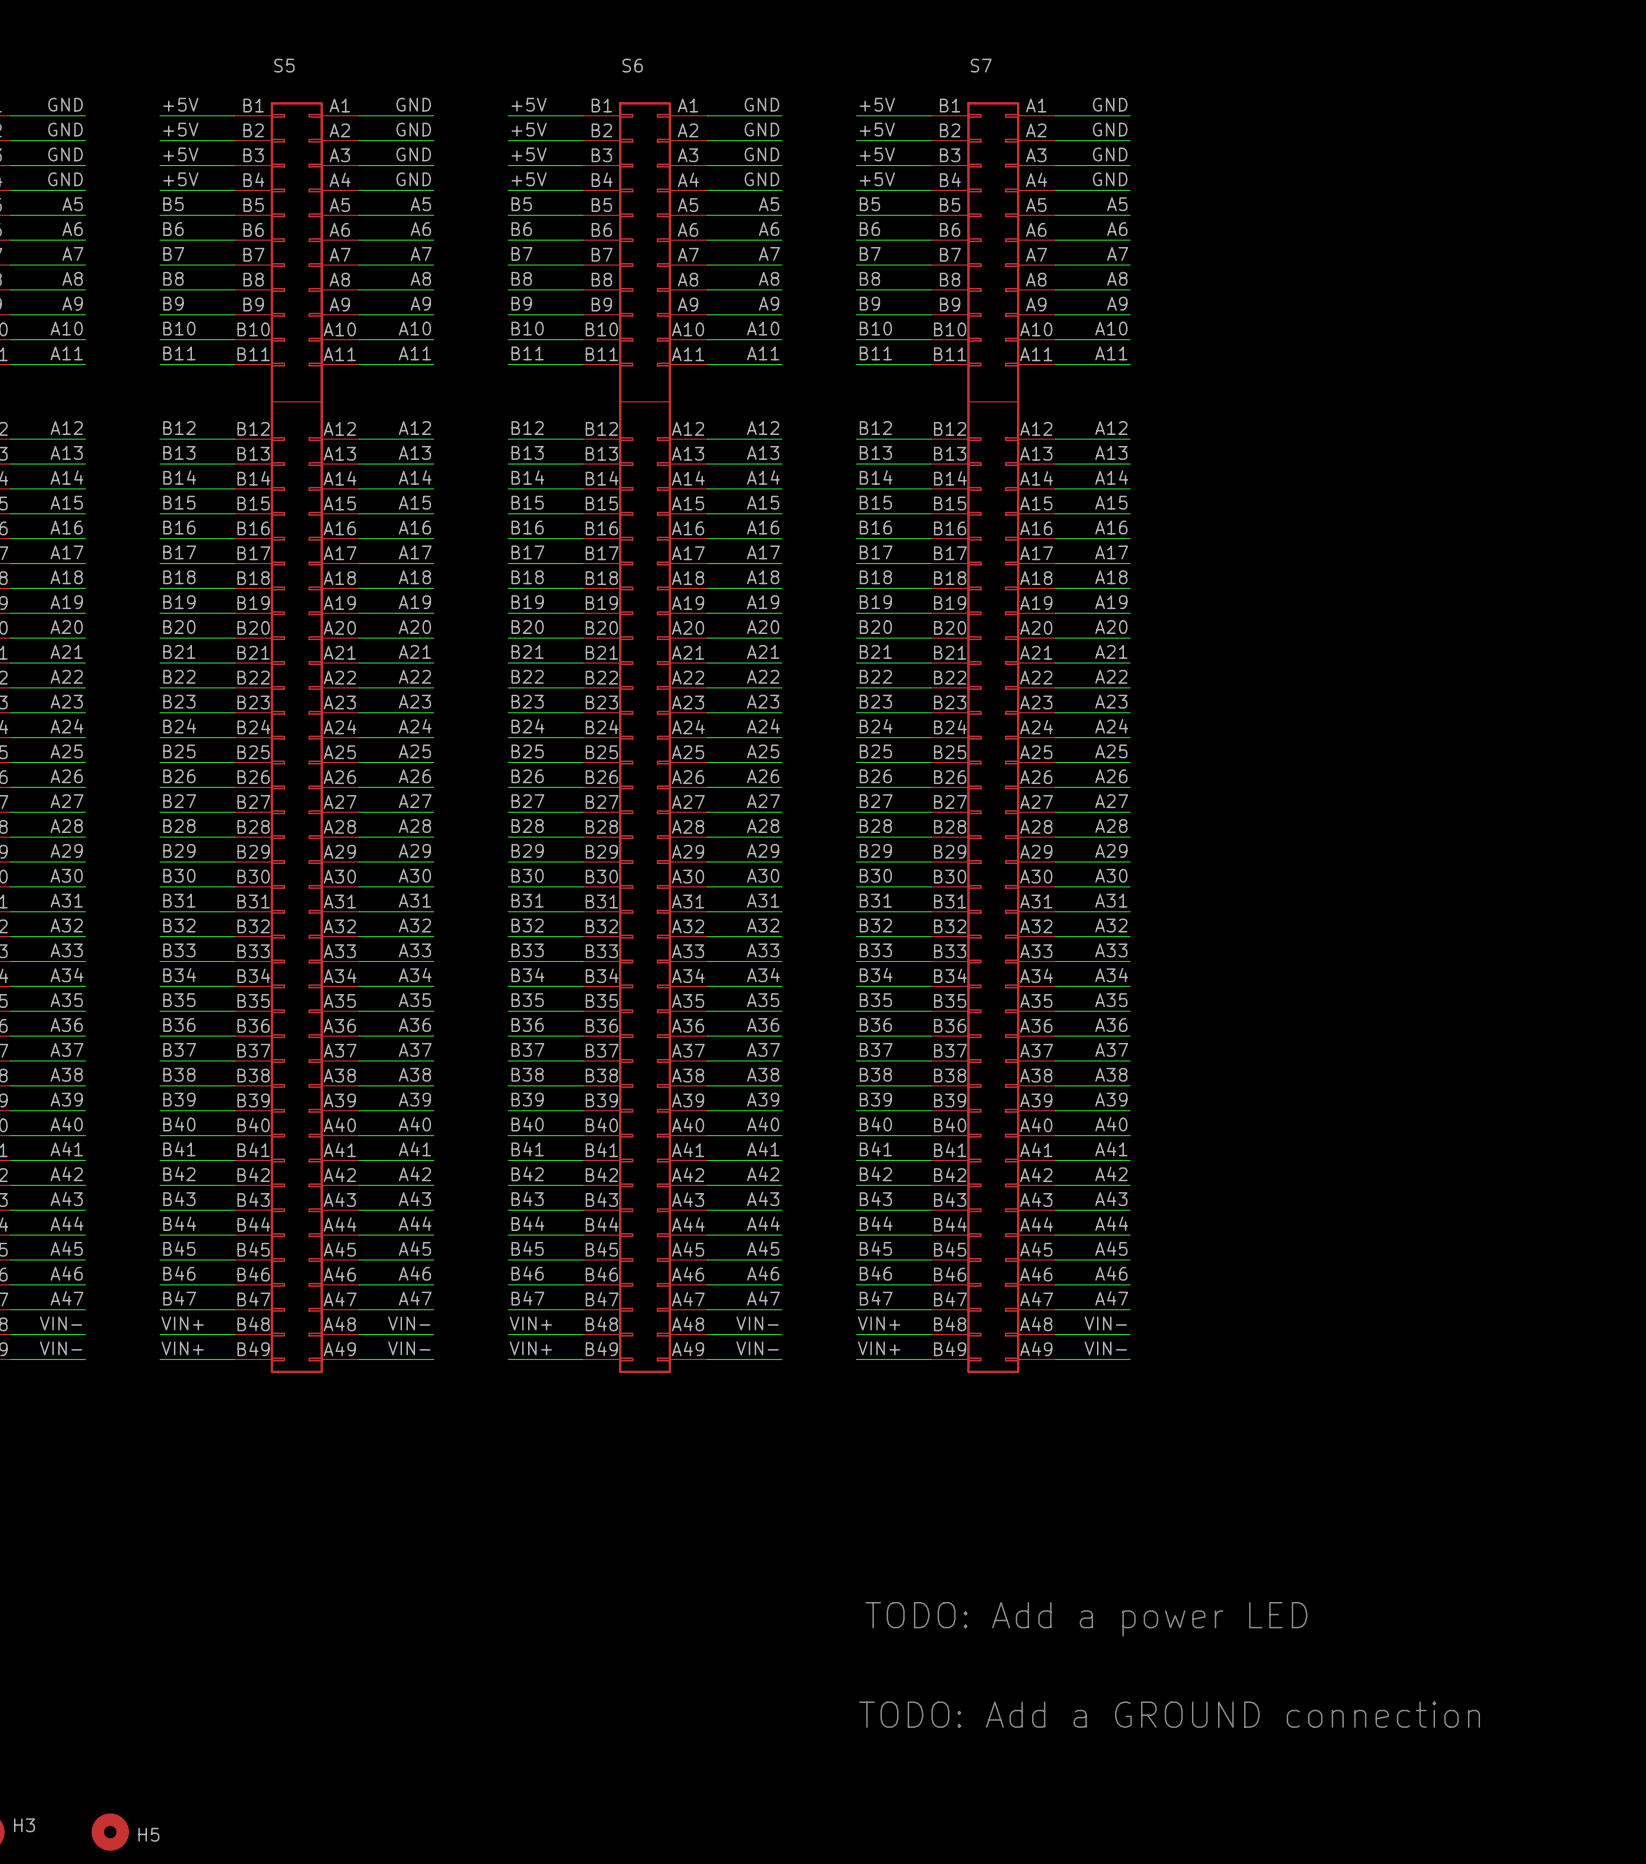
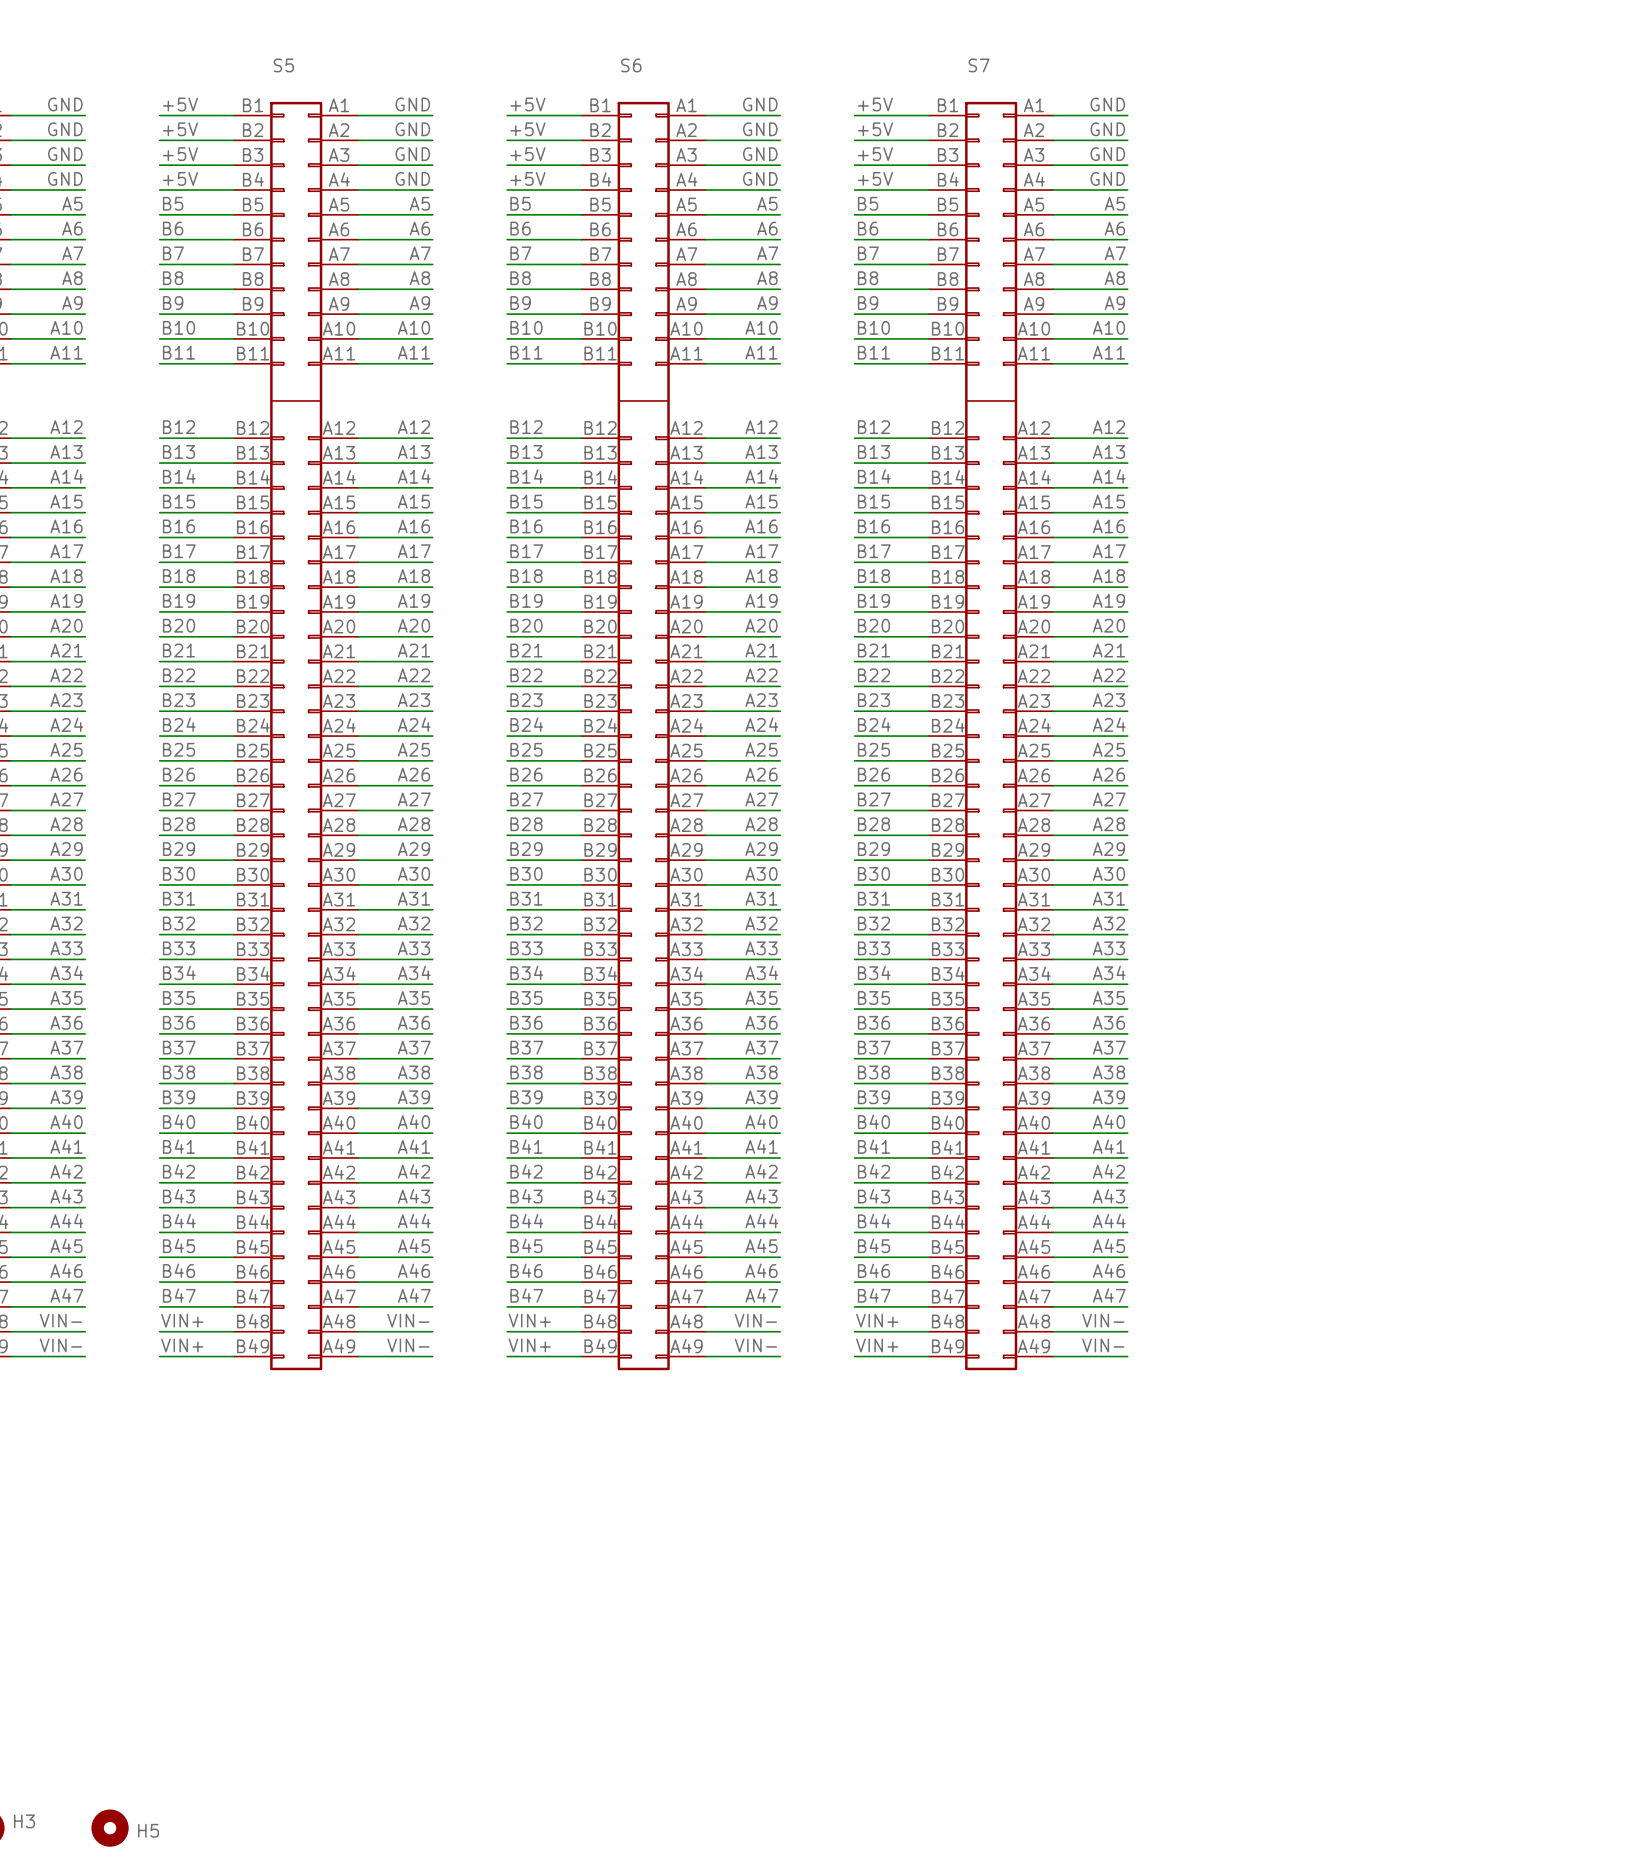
text: TODO: Add a power LED (1086, 1619) -> none
text: TODO: Add a GROUND connection (1169, 1714) -> none

